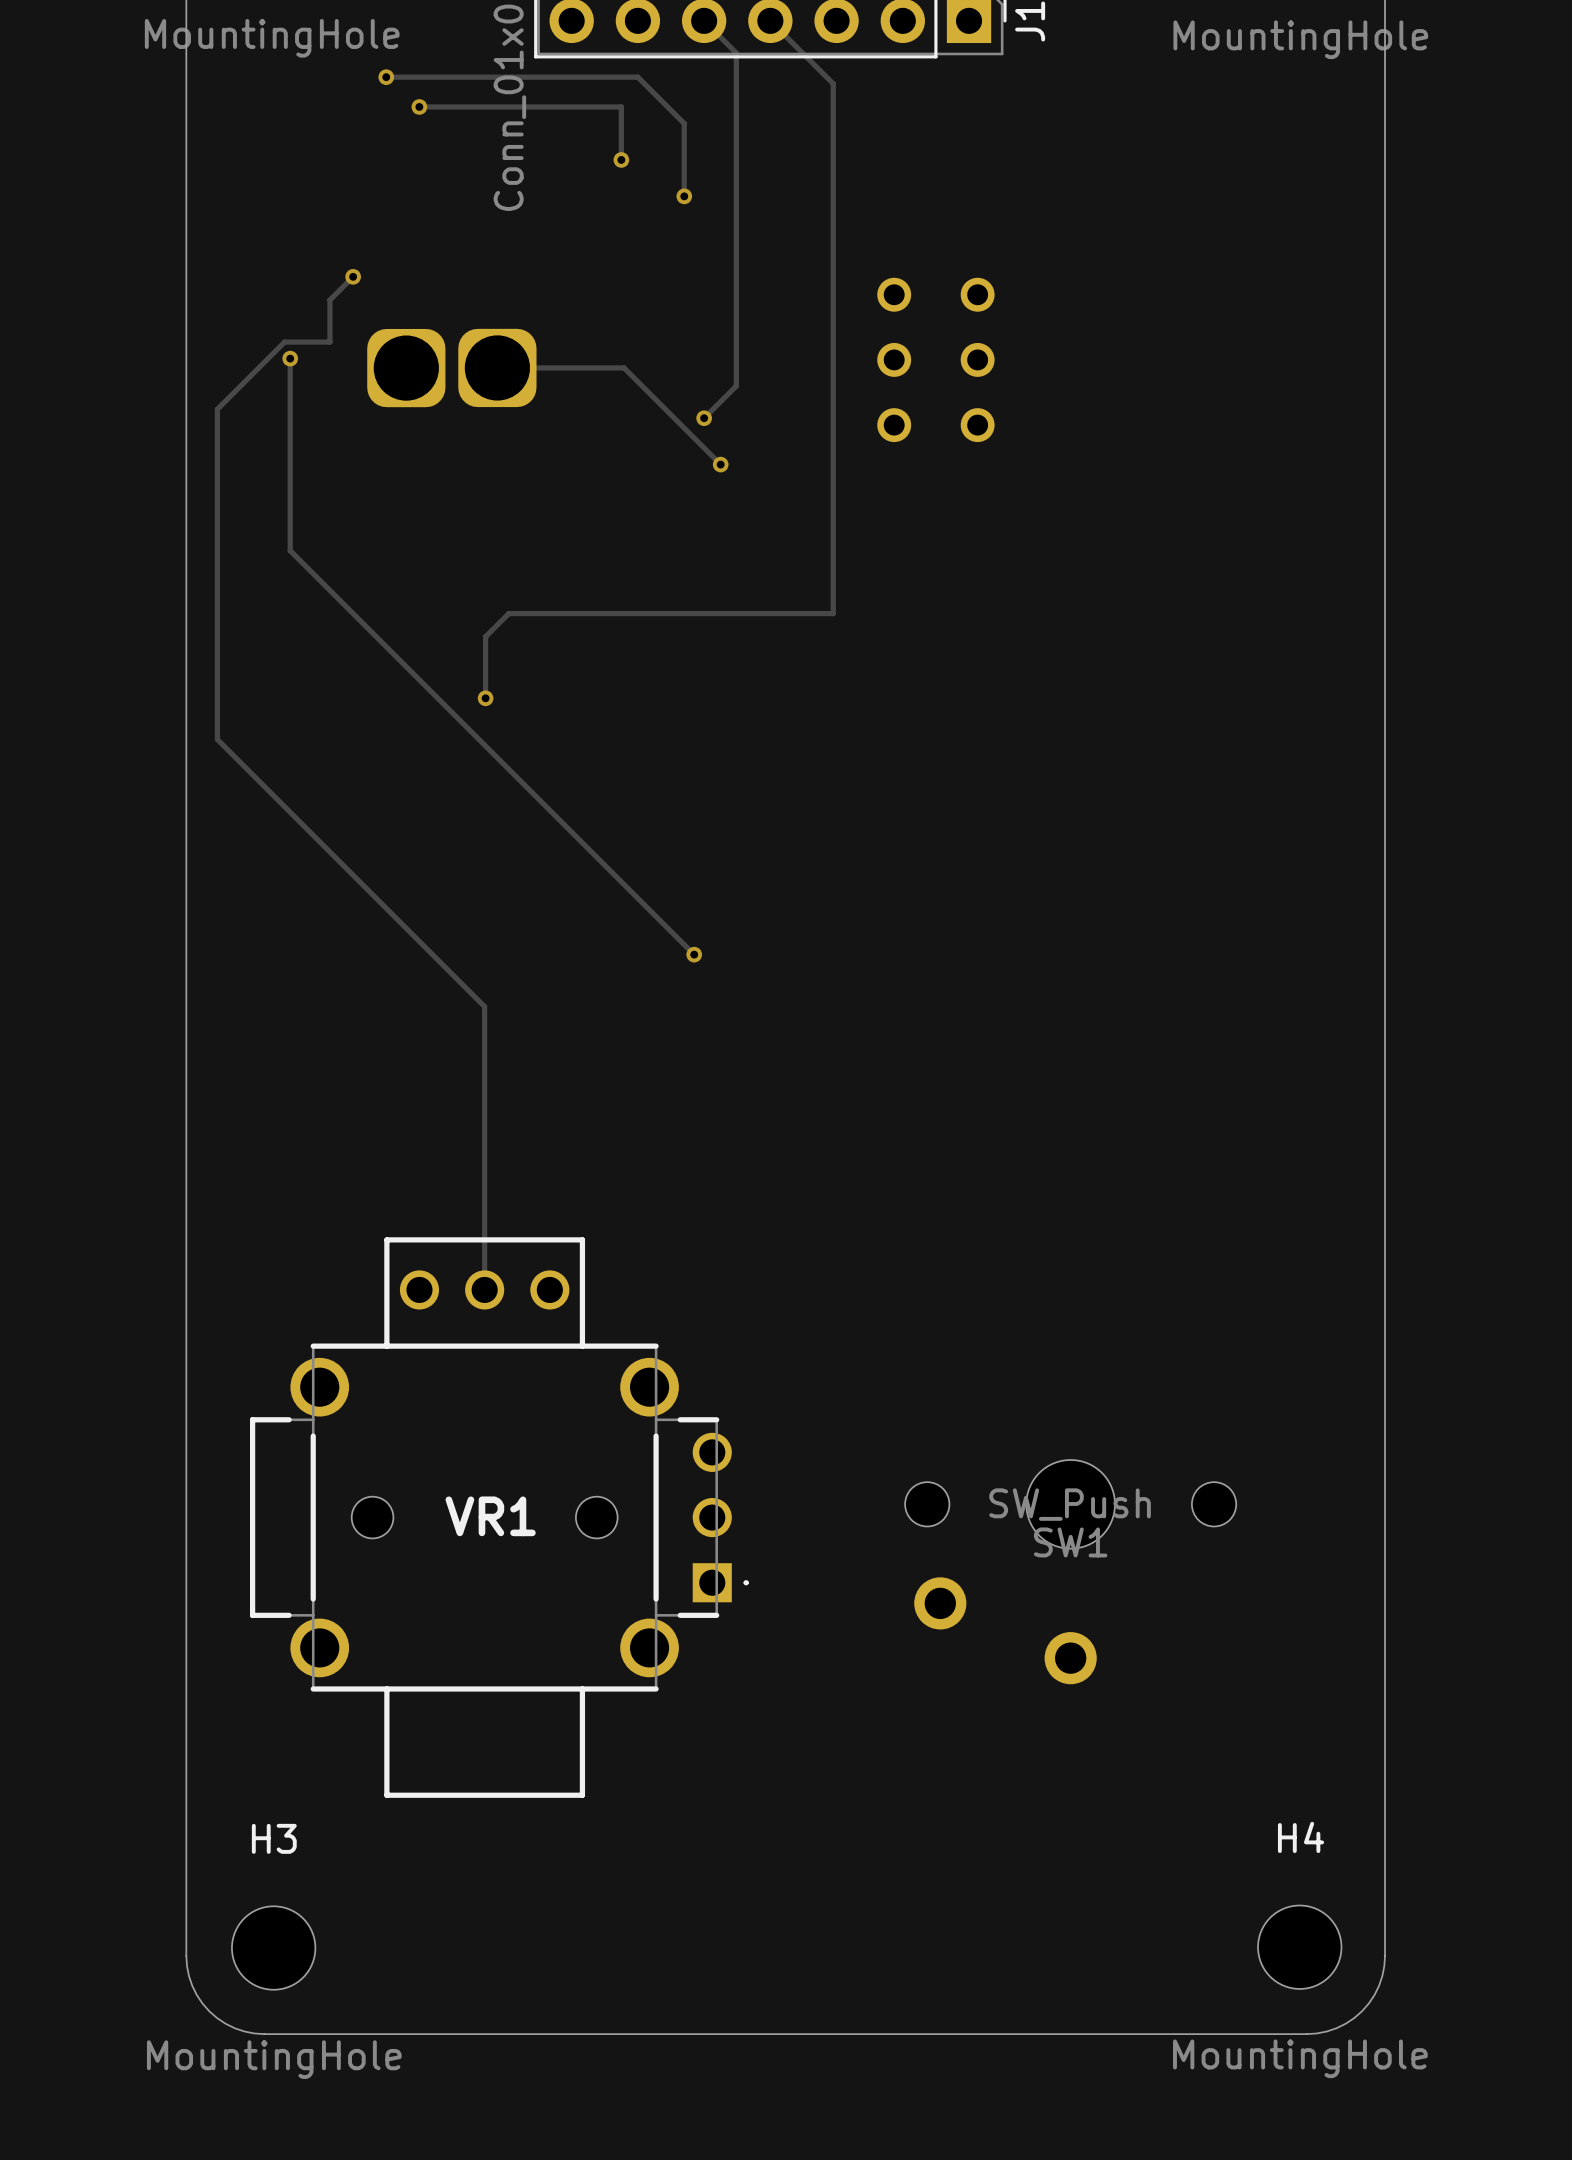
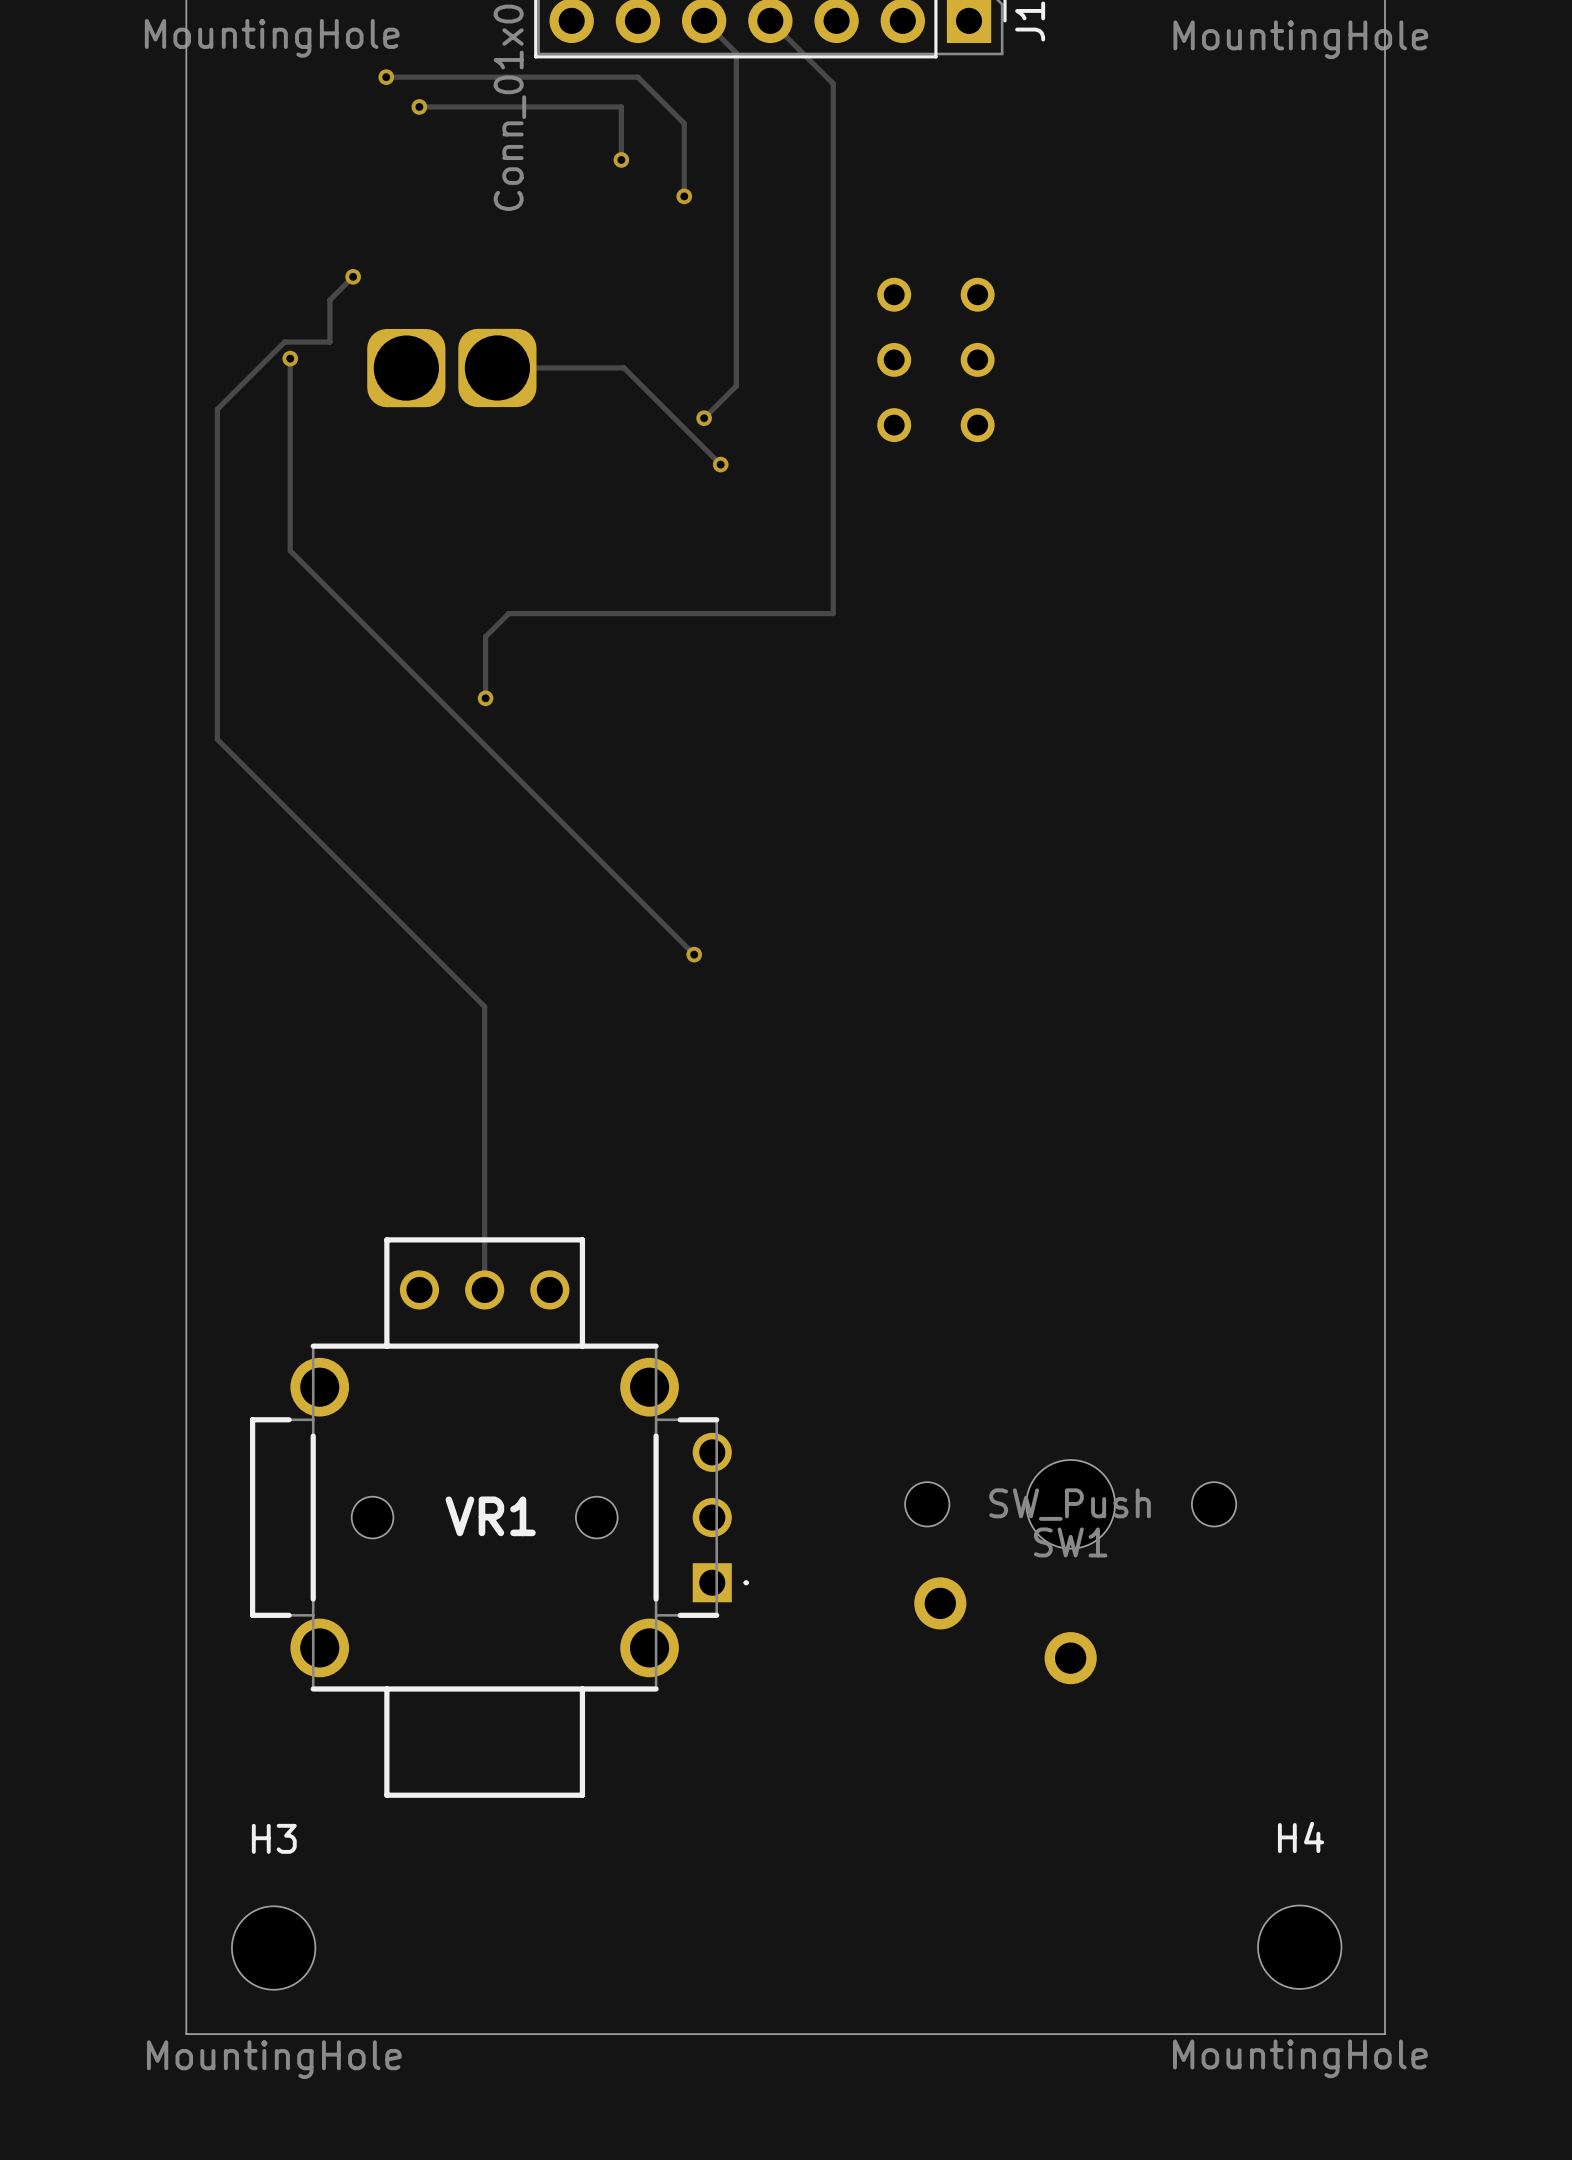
board edge: (186, 1955) (192, 1985) (209, 2011) (234, 2028) (264, 2034) -> (186, 1955) (186, 2034) (264, 2034)
board edge: (1385, 1955) (1379, 1985) (1362, 2011) (1336, 2028) (1306, 2034) -> (1385, 1955) (1385, 2034) (1306, 2034)

